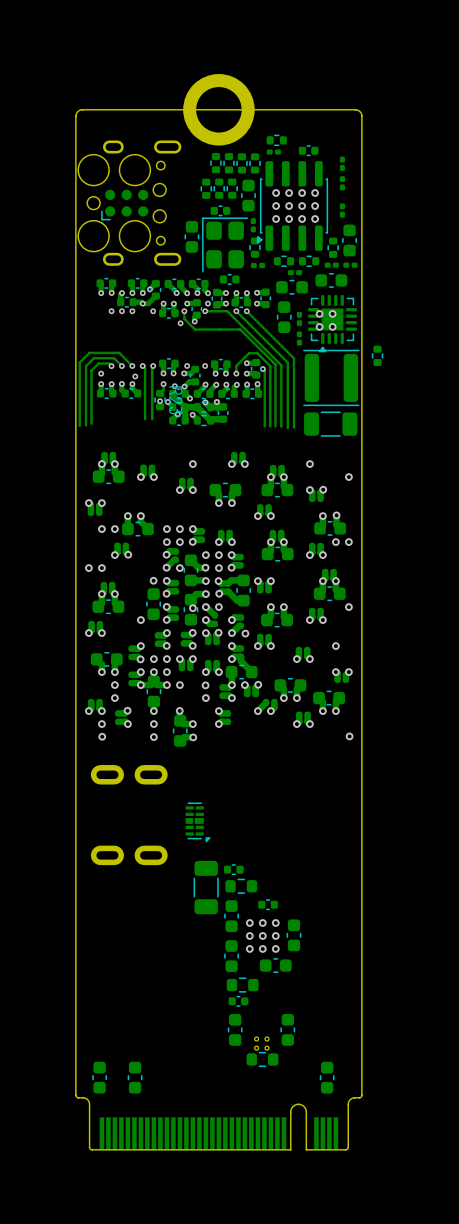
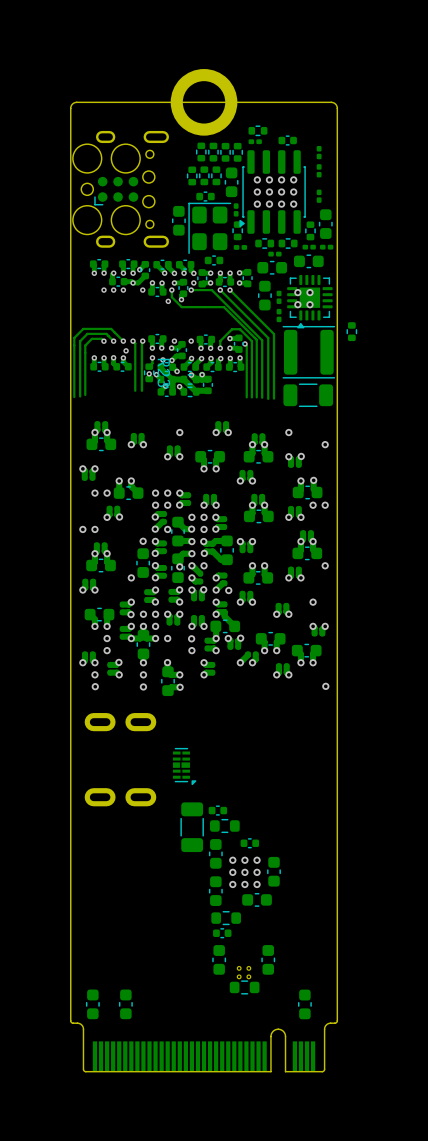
via: (101, 373) -> none

